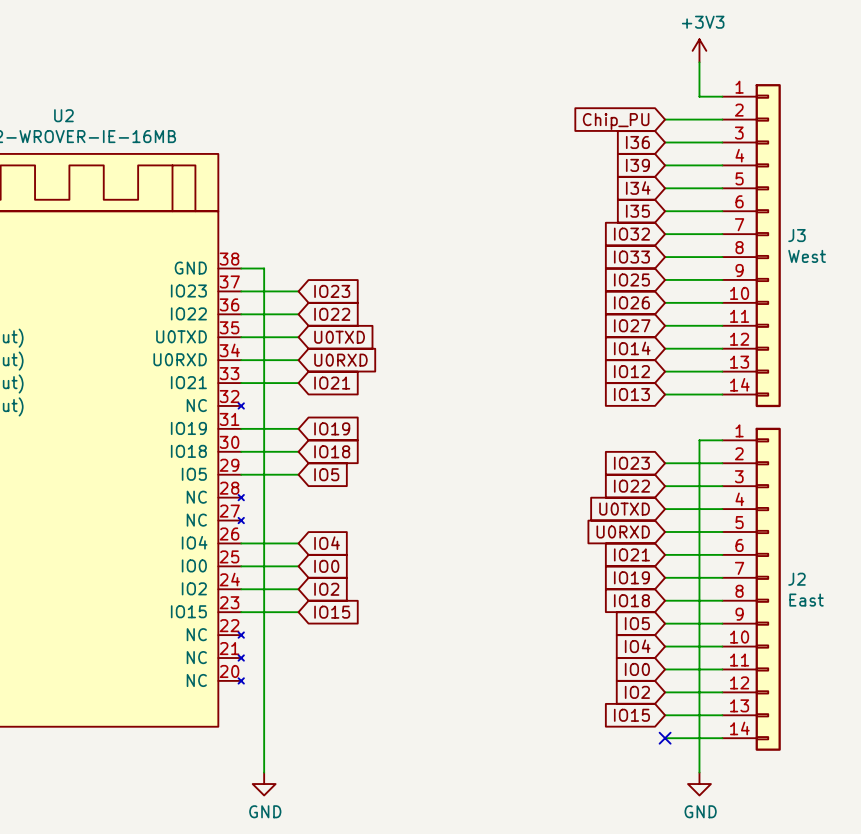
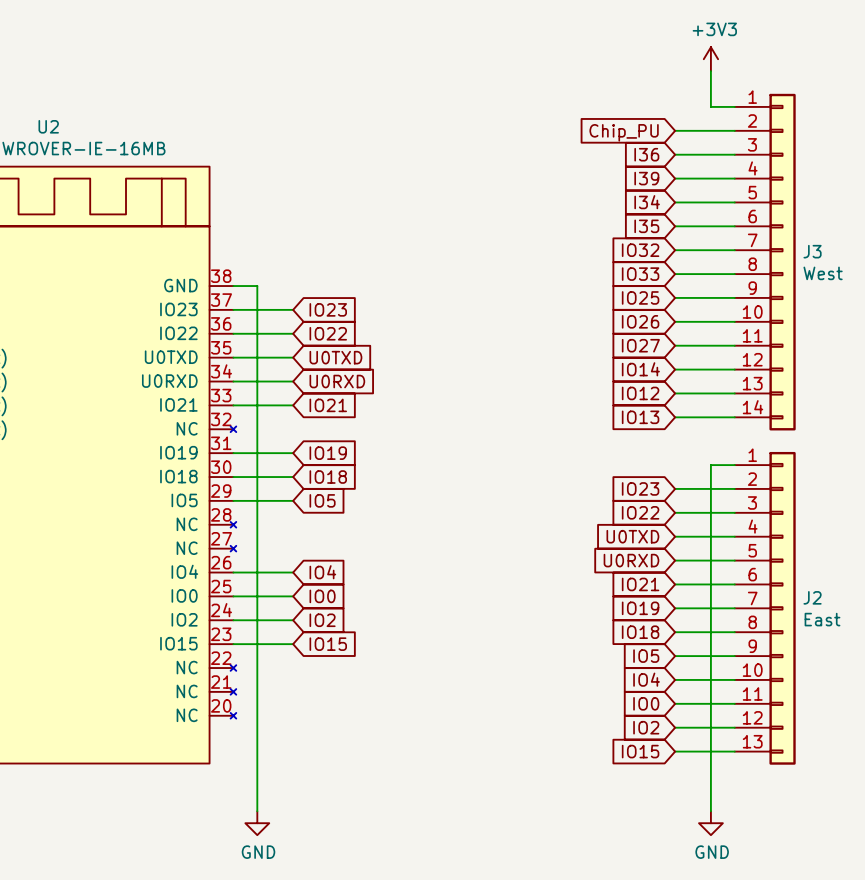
J2 symbol: [722, 427, 781, 751] -> [734, 451, 796, 765]
wire: (665, 738) (722, 738) -> none
no-connect mark: (665, 738) -> none

